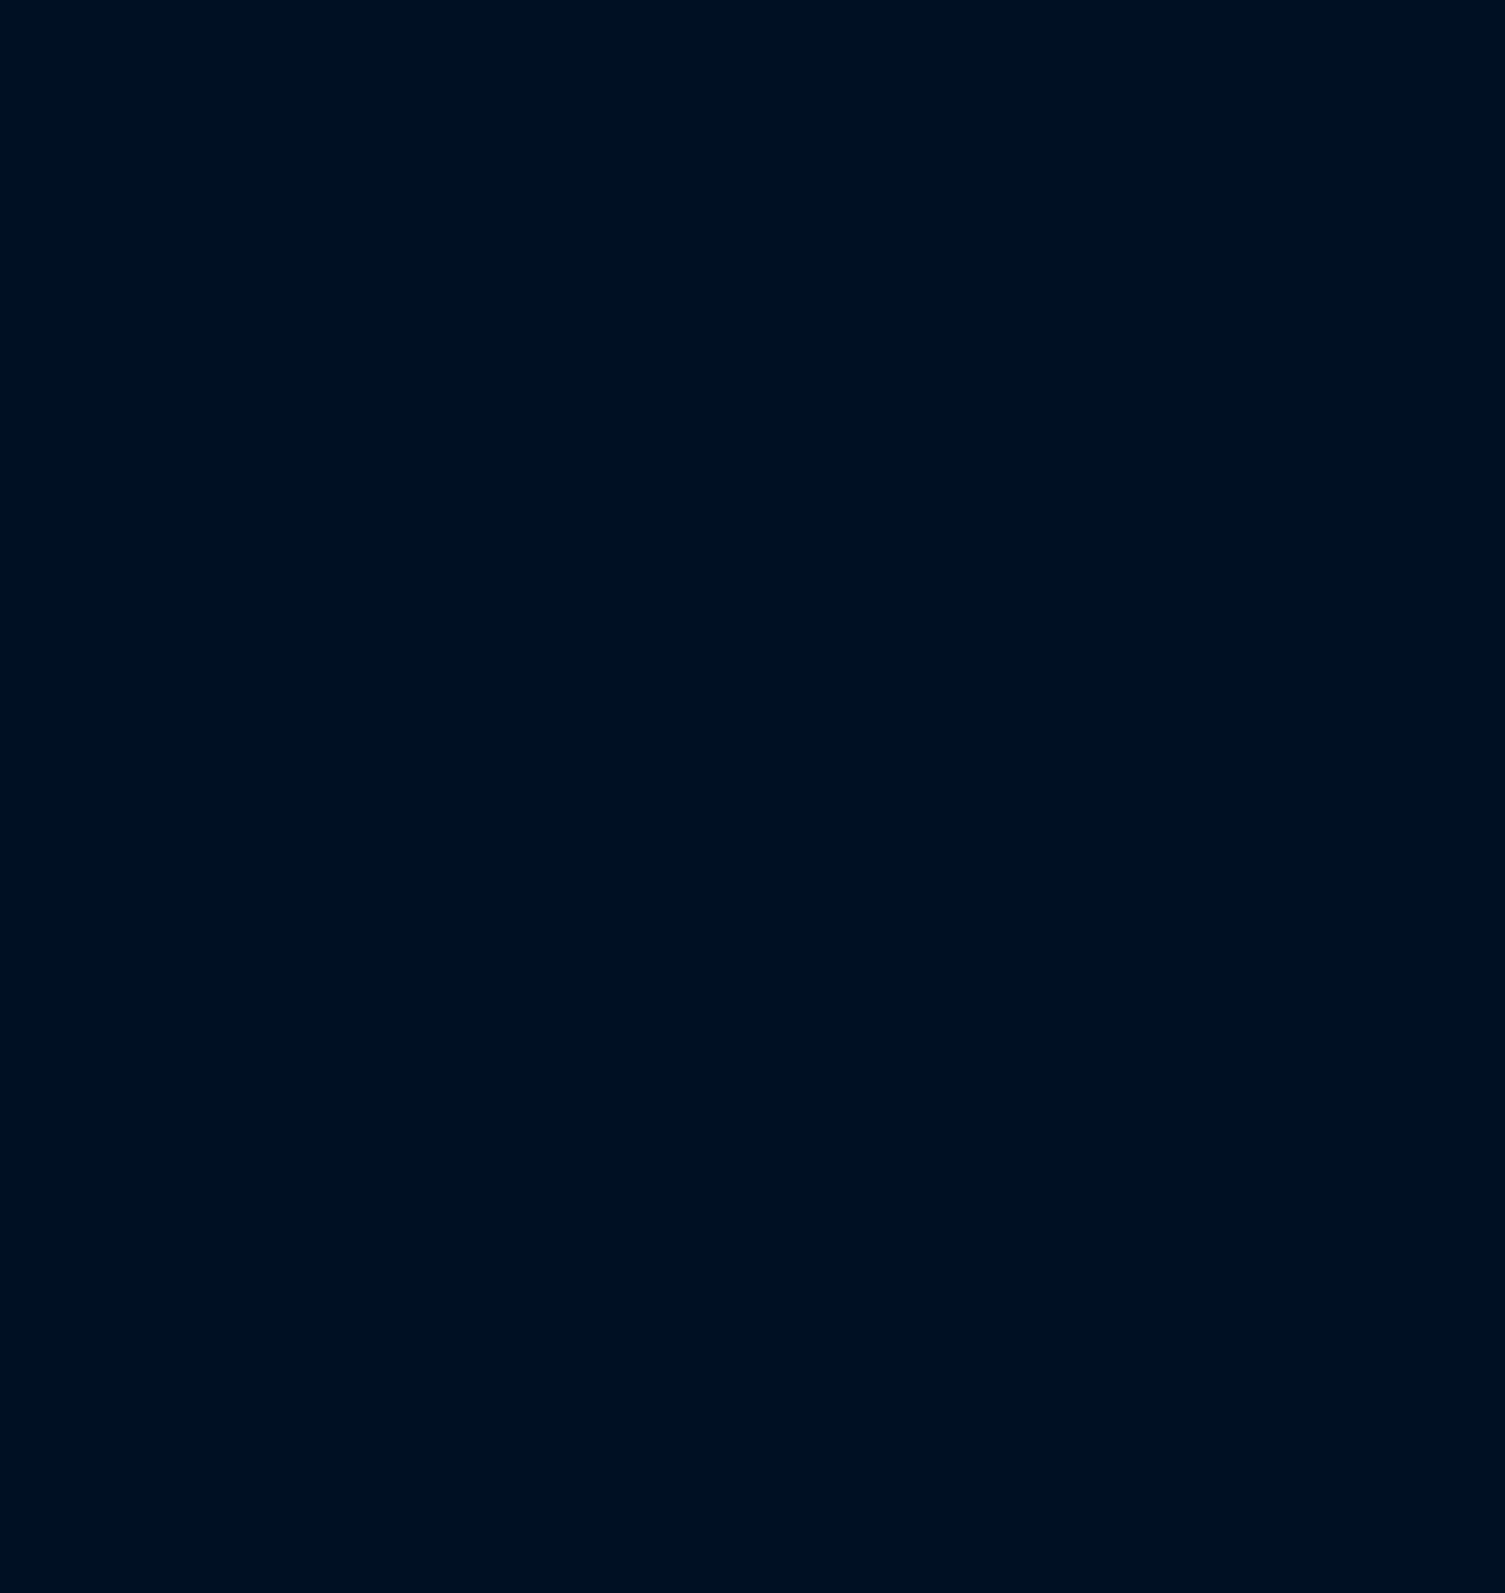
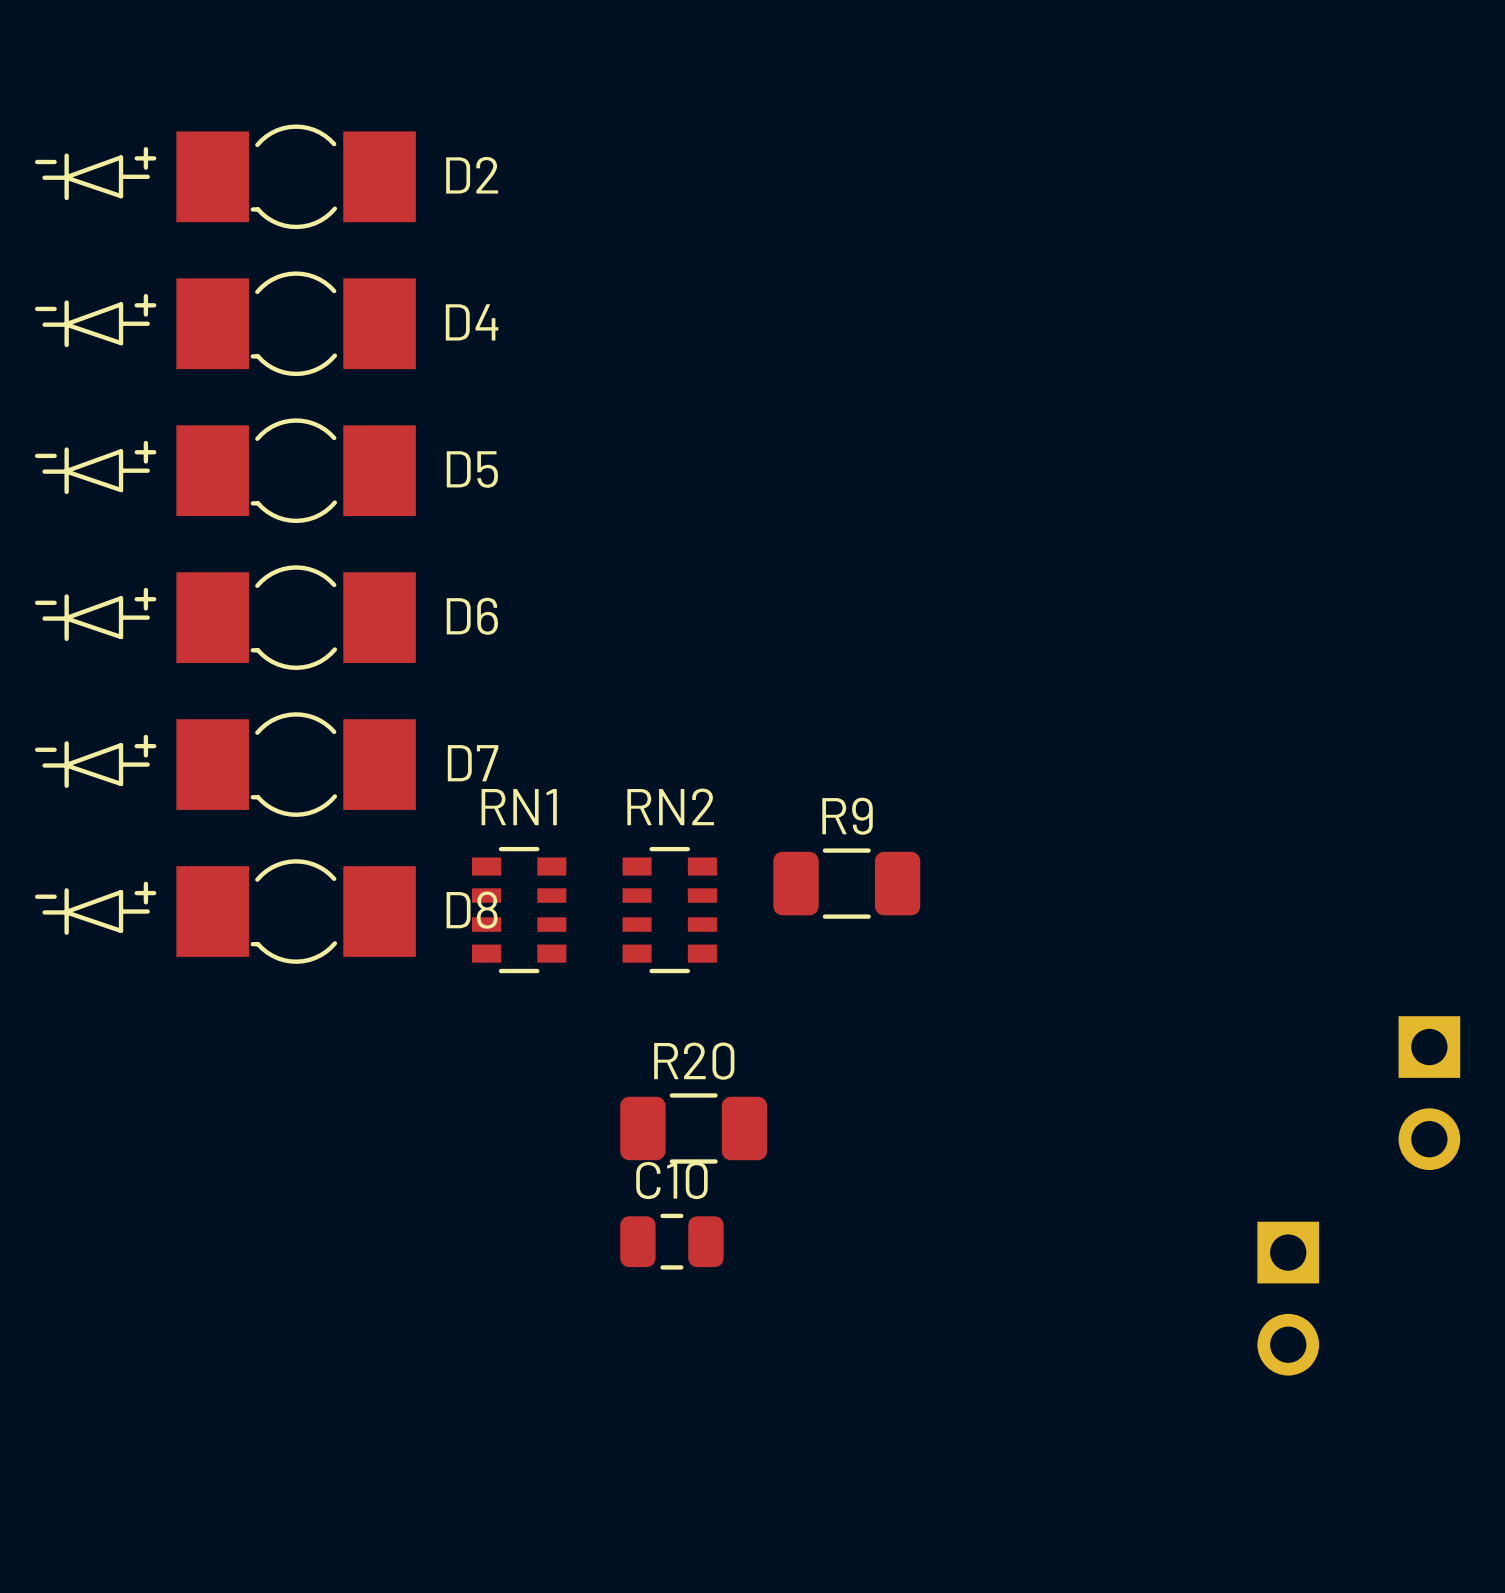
D2: none -> (225, 176)
D4: none -> (225, 323)
D5: none -> (225, 470)
D6: none -> (225, 617)
D7: none -> (225, 764)
R9: none -> (846, 883)
RN1: none -> (519, 910)
RN2: none -> (669, 910)
D8: none -> (225, 911)
part: none -> (1429, 1093)
R20: none -> (693, 1128)
C10: none -> (671, 1241)
part: none -> (1288, 1298)

